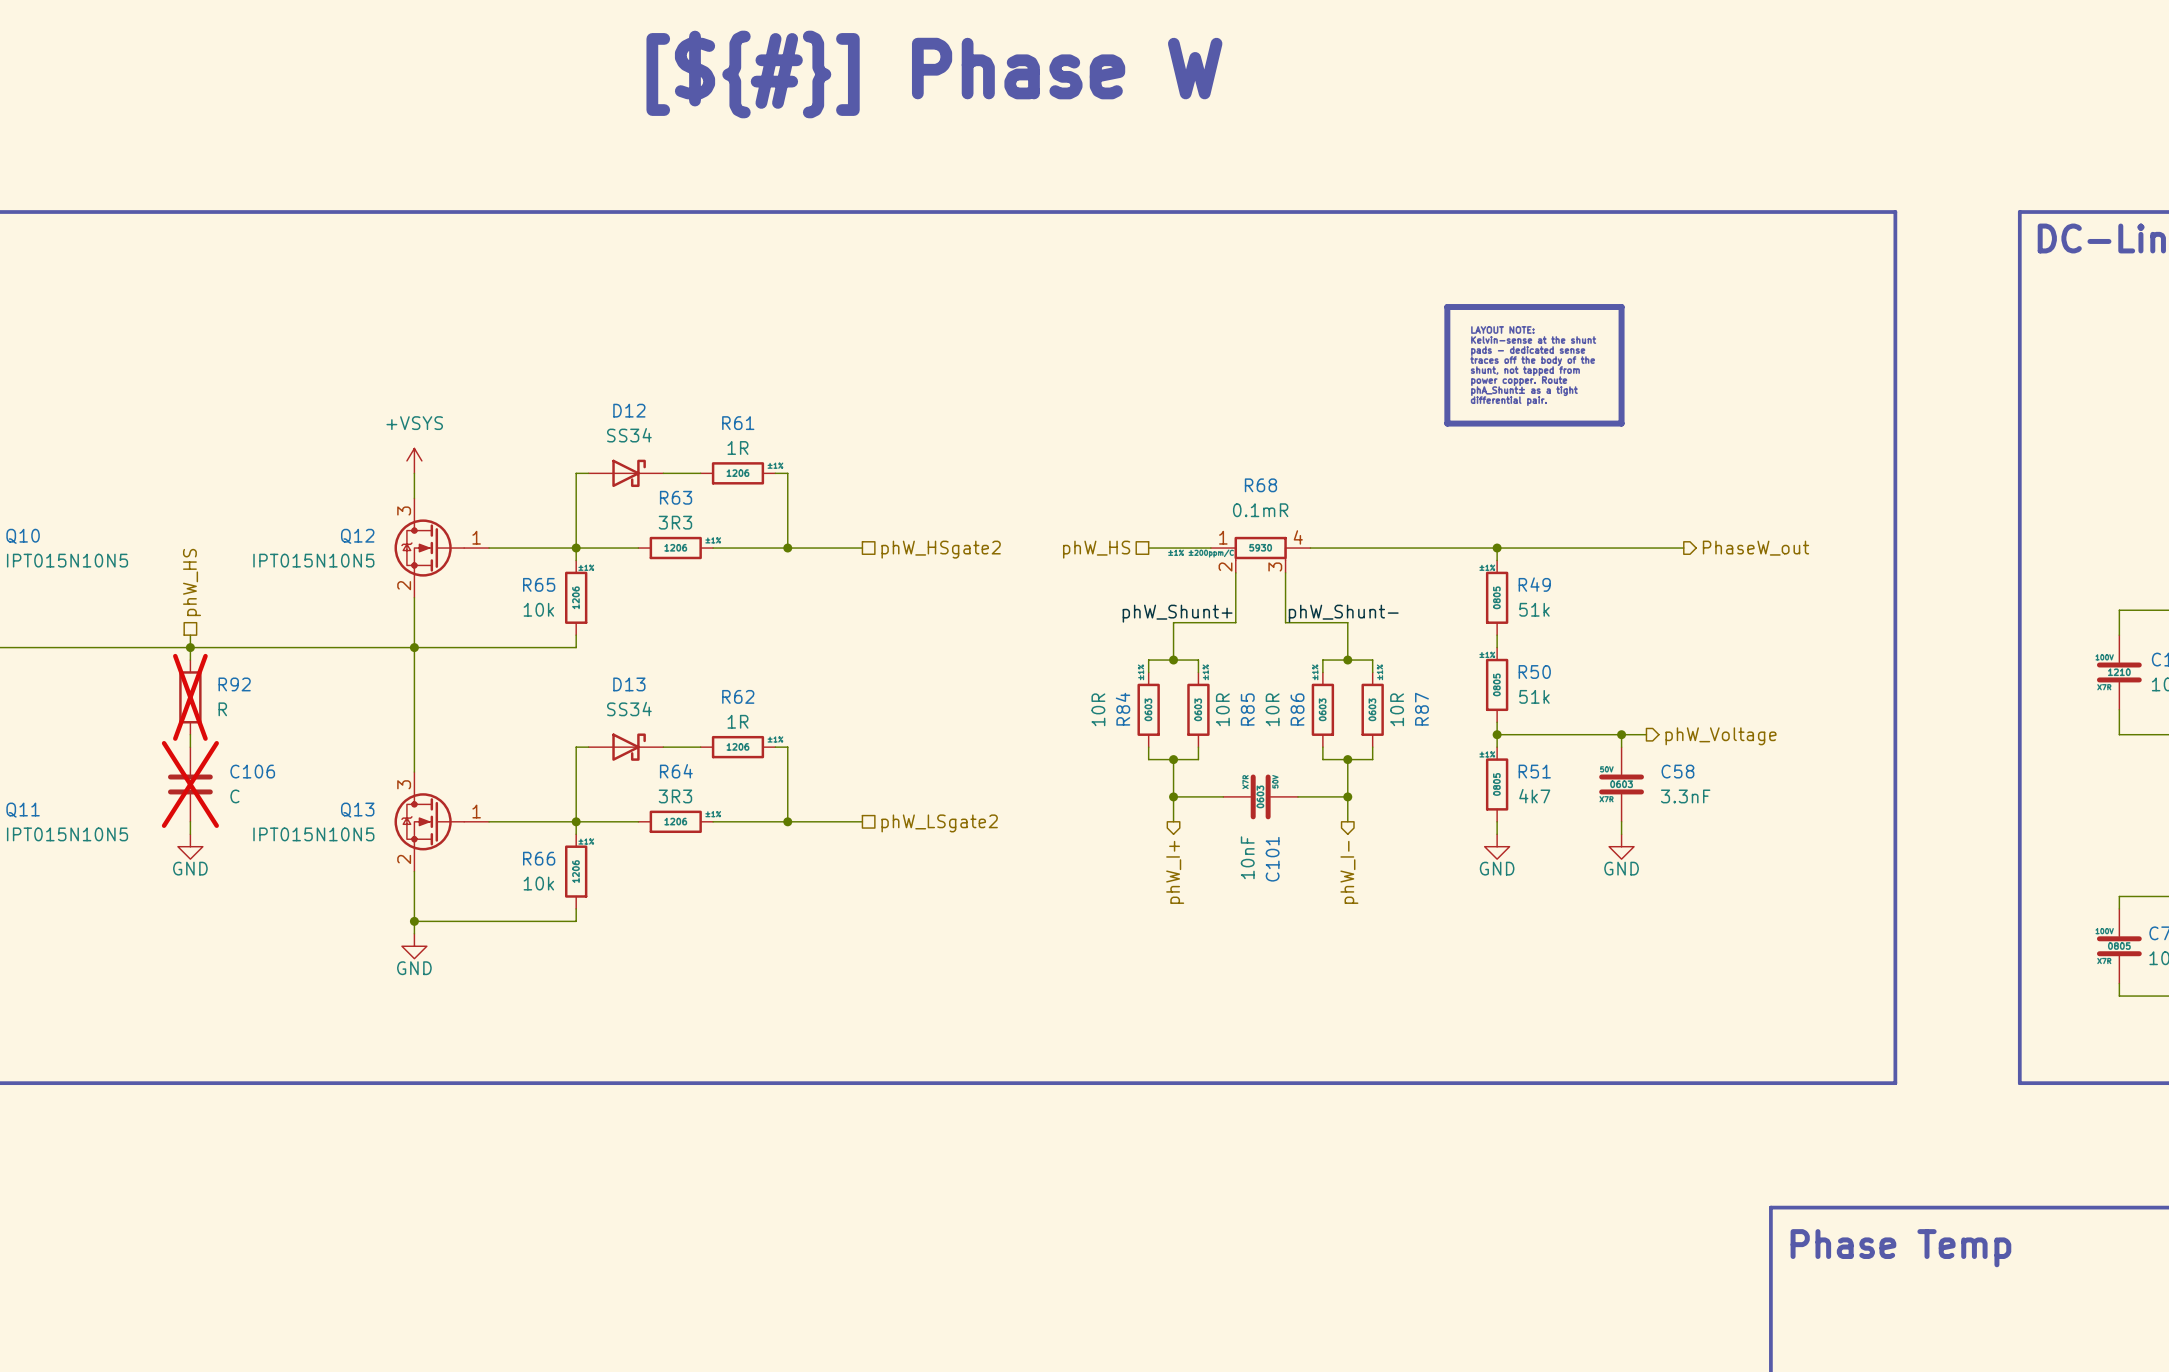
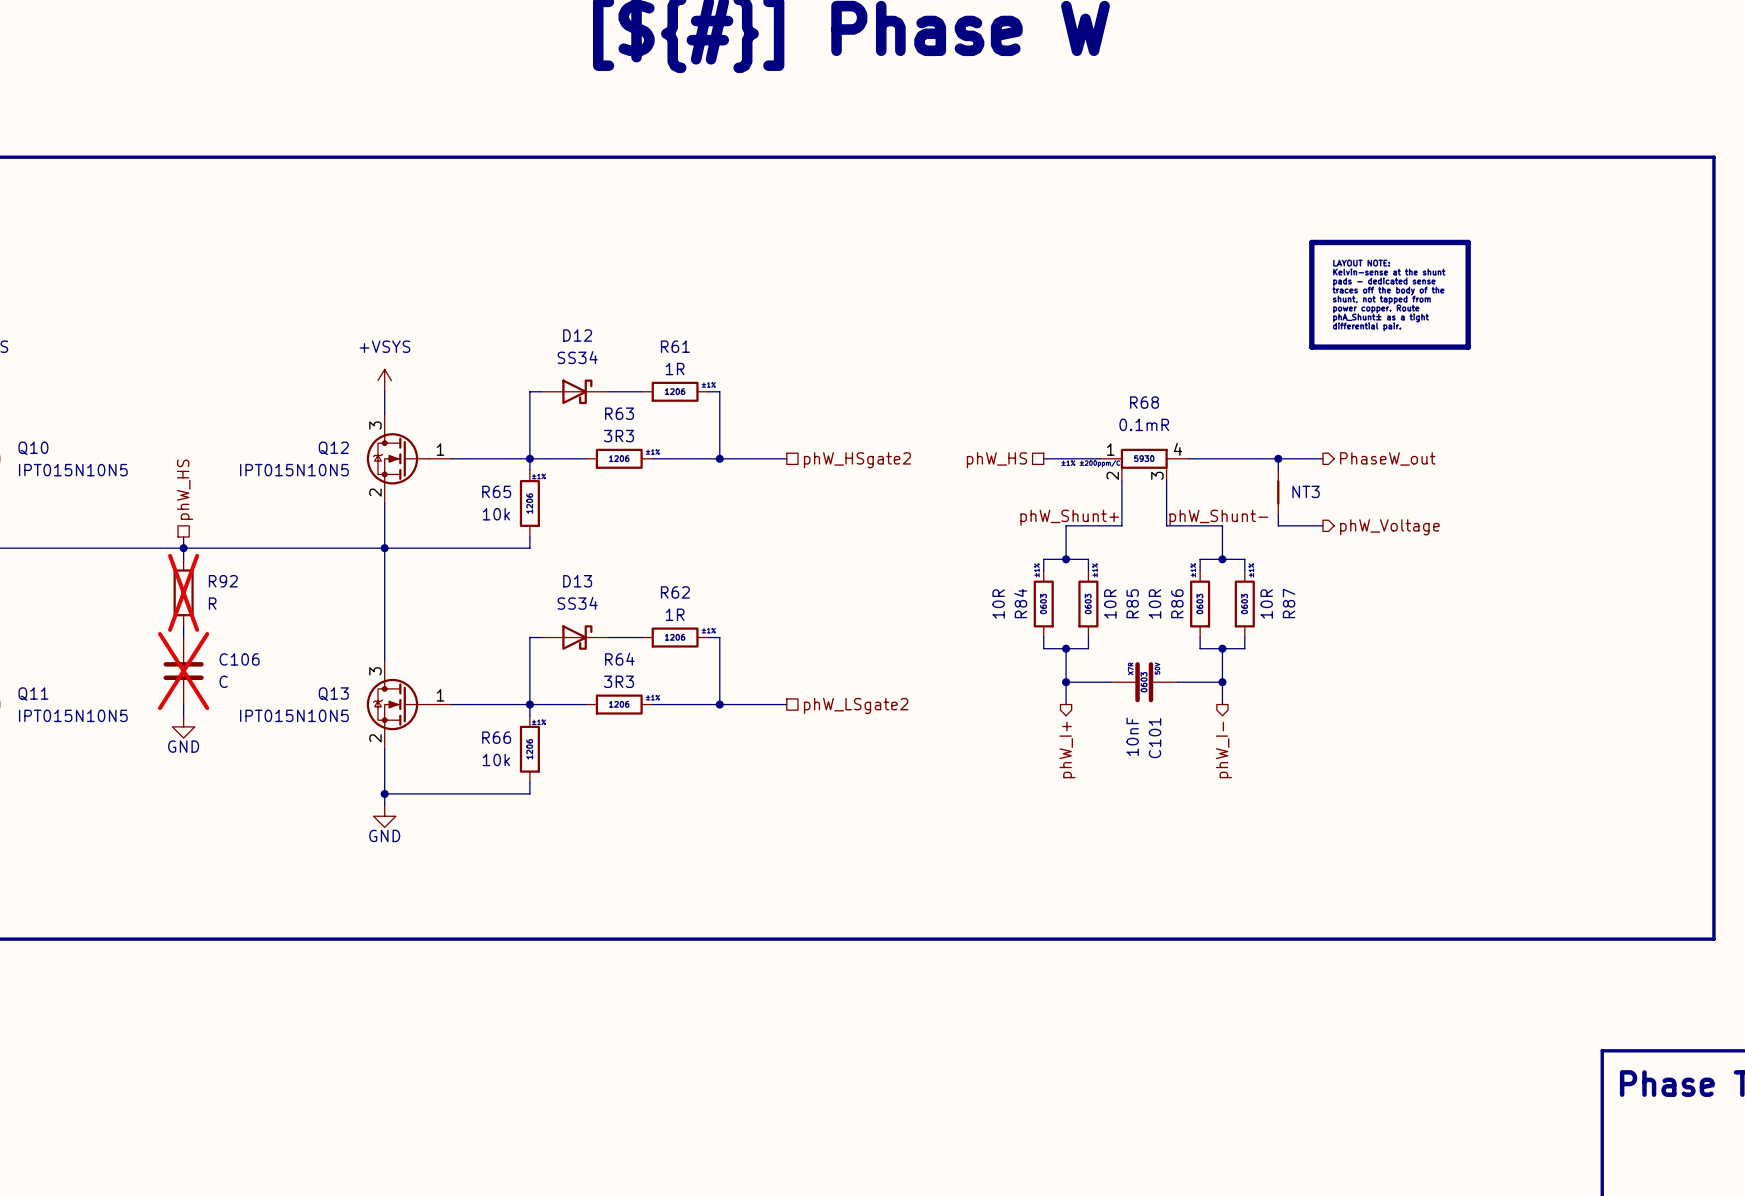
junction: none -> (1278, 458)
wire: (1459, 548) (1683, 548) -> none
wire: (1497, 548) (1497, 560) -> (1278, 458) (1278, 469)
junction: (1497, 548) -> none
hierarchical label position: PhaseW_out (1755, 548) -> PhaseW_out (1387, 458)
NT3: none -> (1278, 492)
R49: 51k (1497, 597) -> none
wire: none -> (1278, 514) (1278, 525) (1322, 525)
wire: (1497, 635) (1497, 647) -> none
R50: 51k (1497, 684) -> none
wire: (1497, 722) (1497, 747) -> none
wire: (1497, 734) (1646, 734) -> none
junction: (1497, 734) -> none
wire: (1621, 734) (1621, 747) -> none
junction: (1621, 734) -> none
hierarchical label position: phW_Voltage (1721, 736) -> phW_Voltage (1389, 527)
R51: 4k7 (1497, 784) -> none
C58: 3.3nF (1621, 784) -> none
wire: (1497, 821) (1497, 834) -> none
wire: (1621, 821) (1621, 834) -> none
power symbol: GND (1497, 846) -> none
power symbol: GND (1621, 846) -> none

